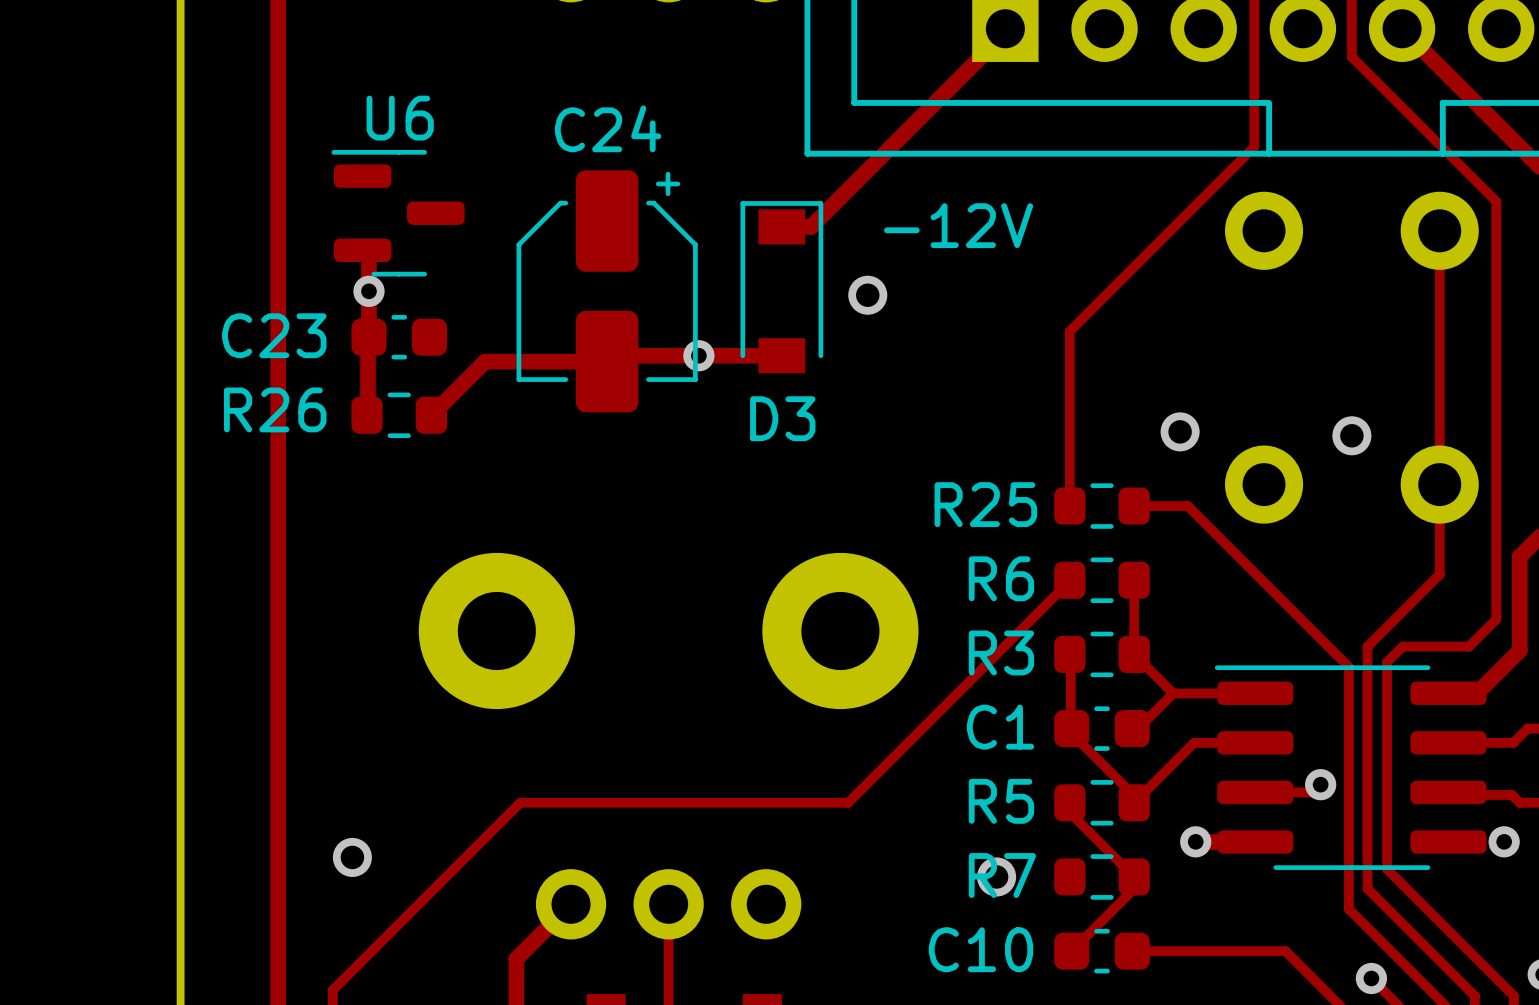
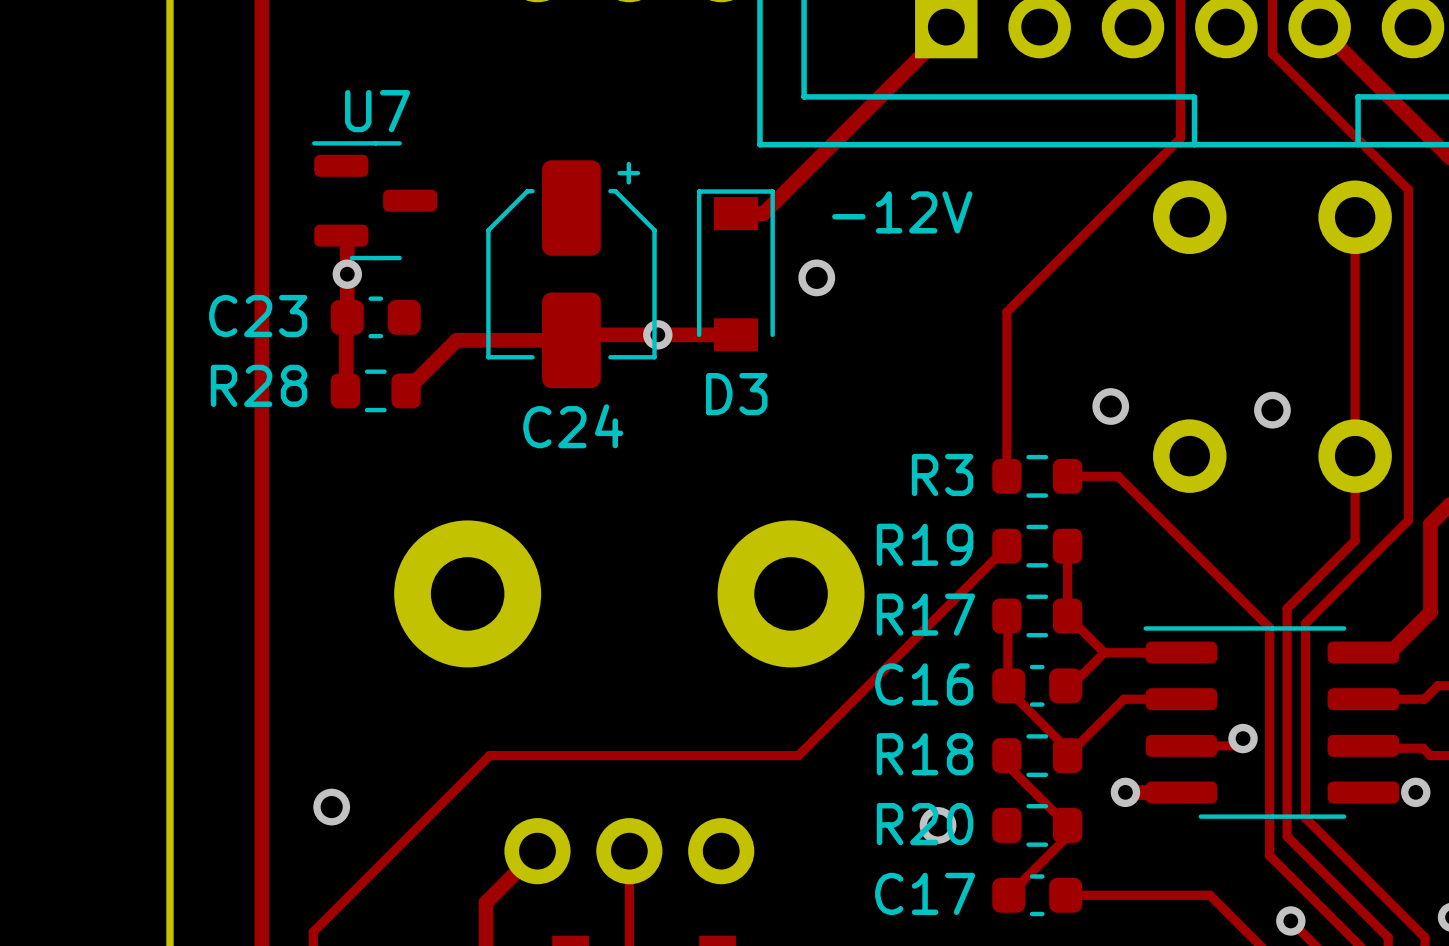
U6 name: U6 (400, 118) -> U7 (377, 111)
C24 name position: C24 (608, 128) -> C24 (573, 426)
R26 name: R26 (275, 409) -> R28 (259, 385)
R25 name: R25 (985, 504) -> R3 (942, 474)
track: (1496, 552) (1496, 619) (1469, 646) (1402, 646) -> (1408, 520) (1320, 608)
R6 name: R6 (1001, 578) -> R19 (925, 544)
R3 name: R3 (1001, 652) -> R17 (925, 614)
C1 name: C1 (1000, 727) -> C16 (924, 684)
R5 name: R5 (1001, 801) -> R18 (925, 754)
R7 name: R7 (1002, 875) -> R20 (925, 824)
C10 name: C10 (980, 949) -> C17 (925, 893)

